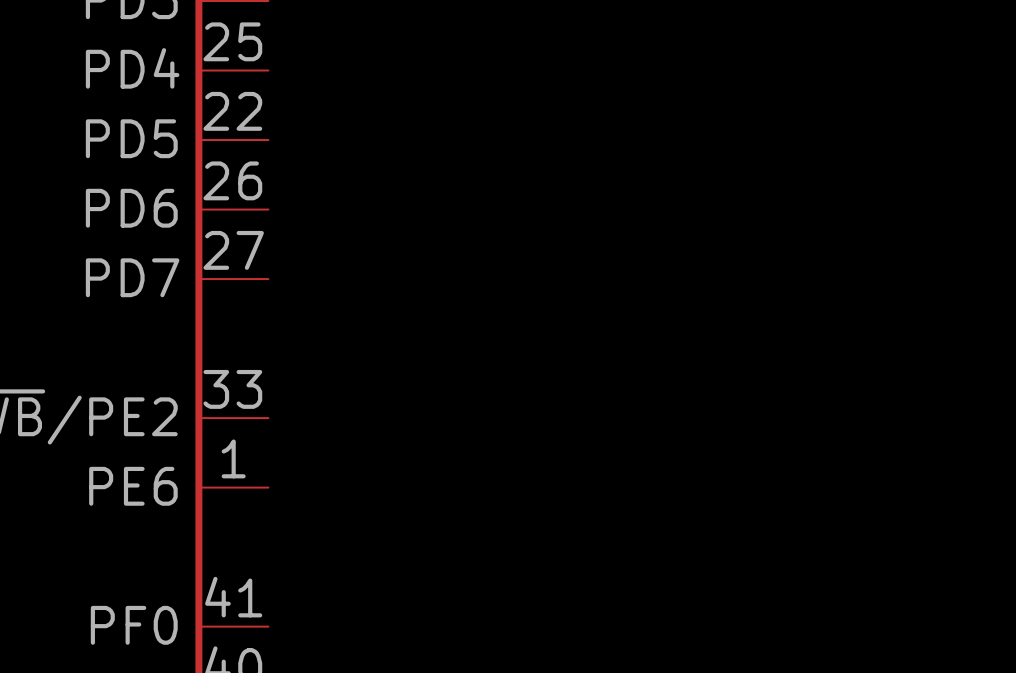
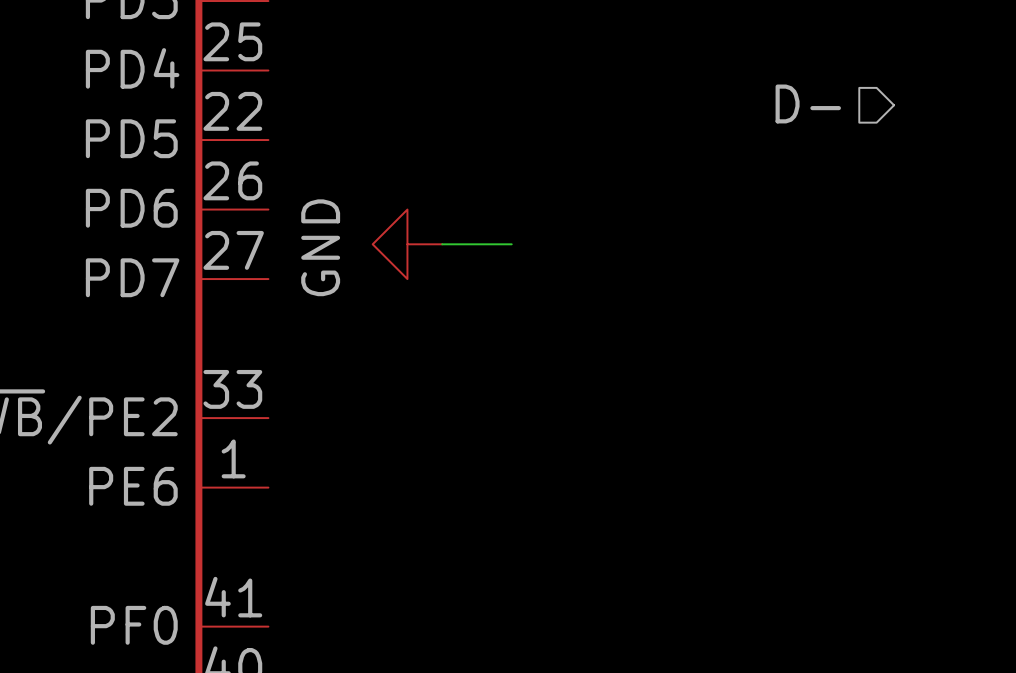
hierarchical label: none -> D- (808, 103)
power symbol: none -> GND (407, 244)
wire: none -> (442, 244) (511, 244)

